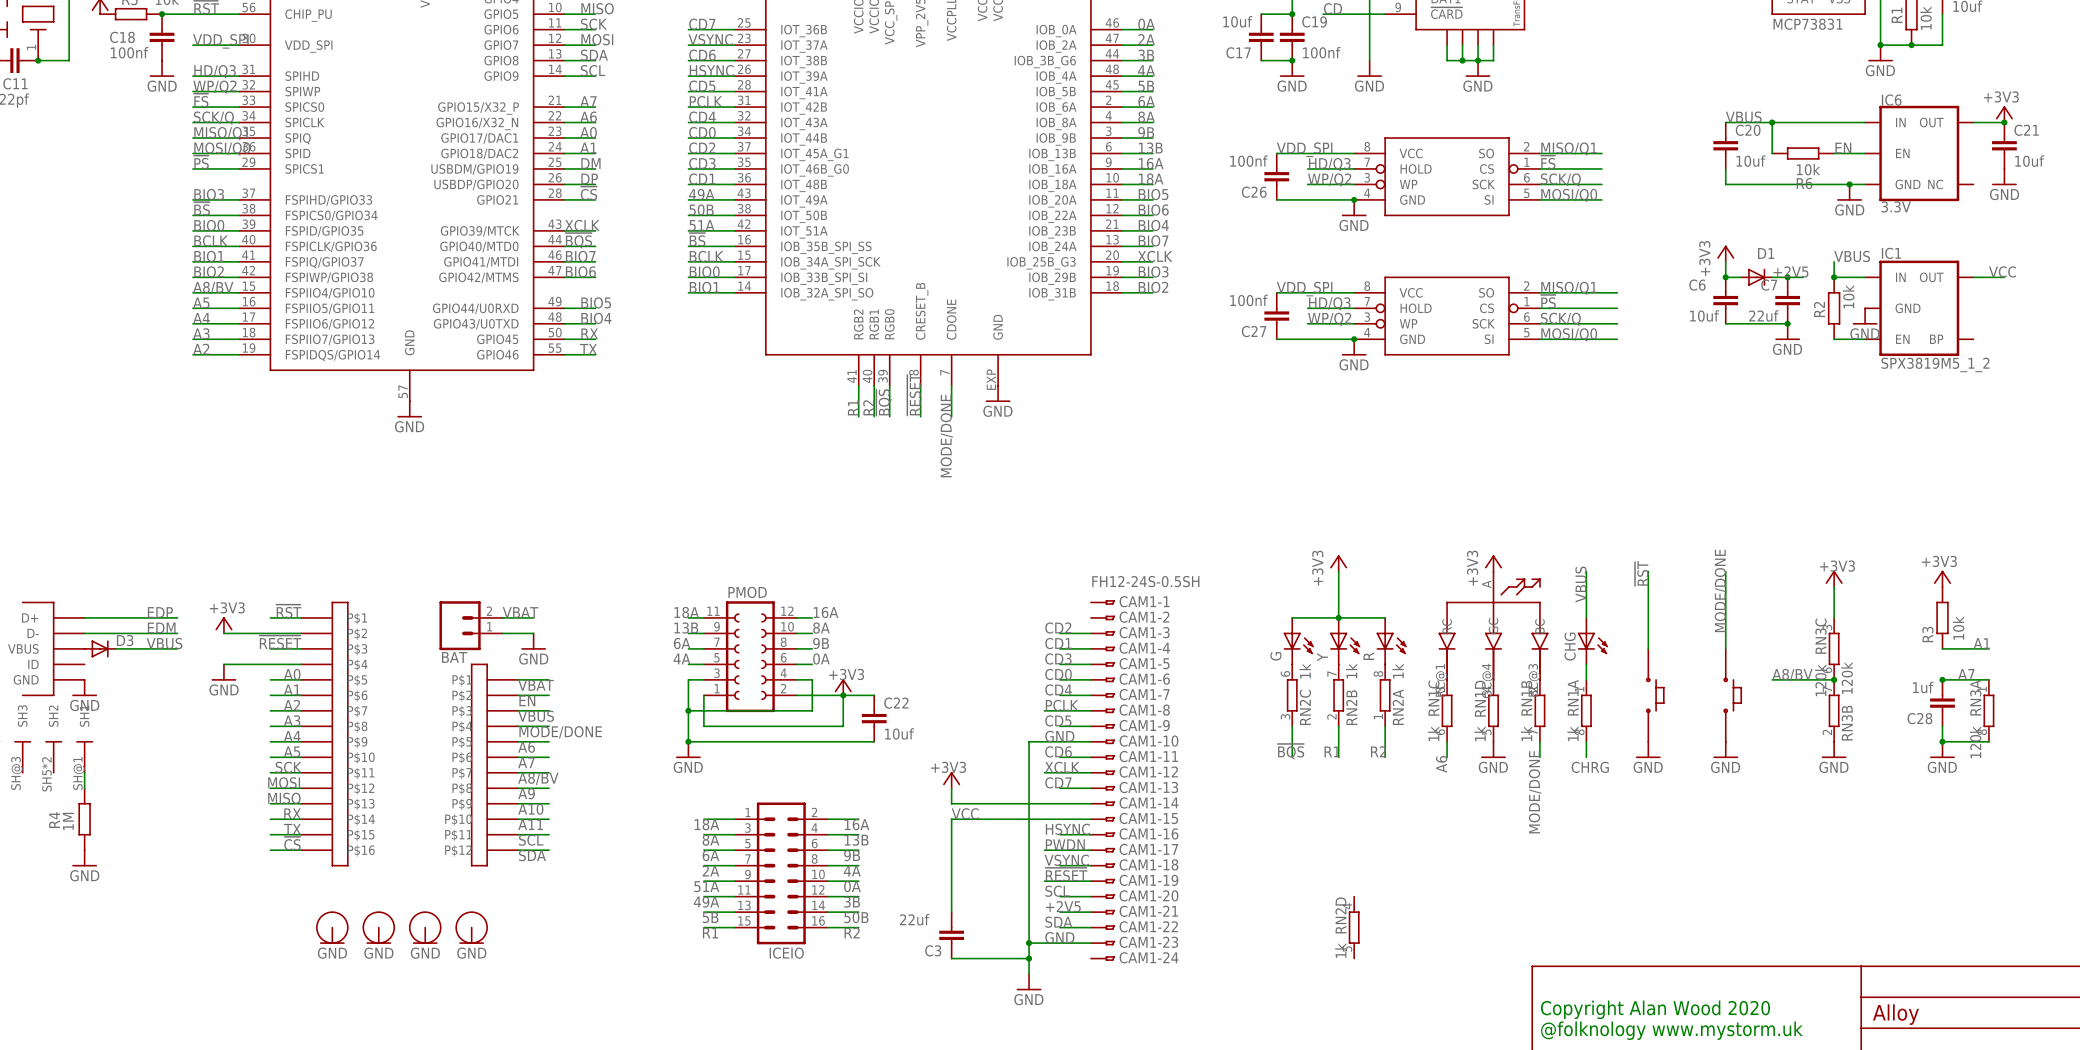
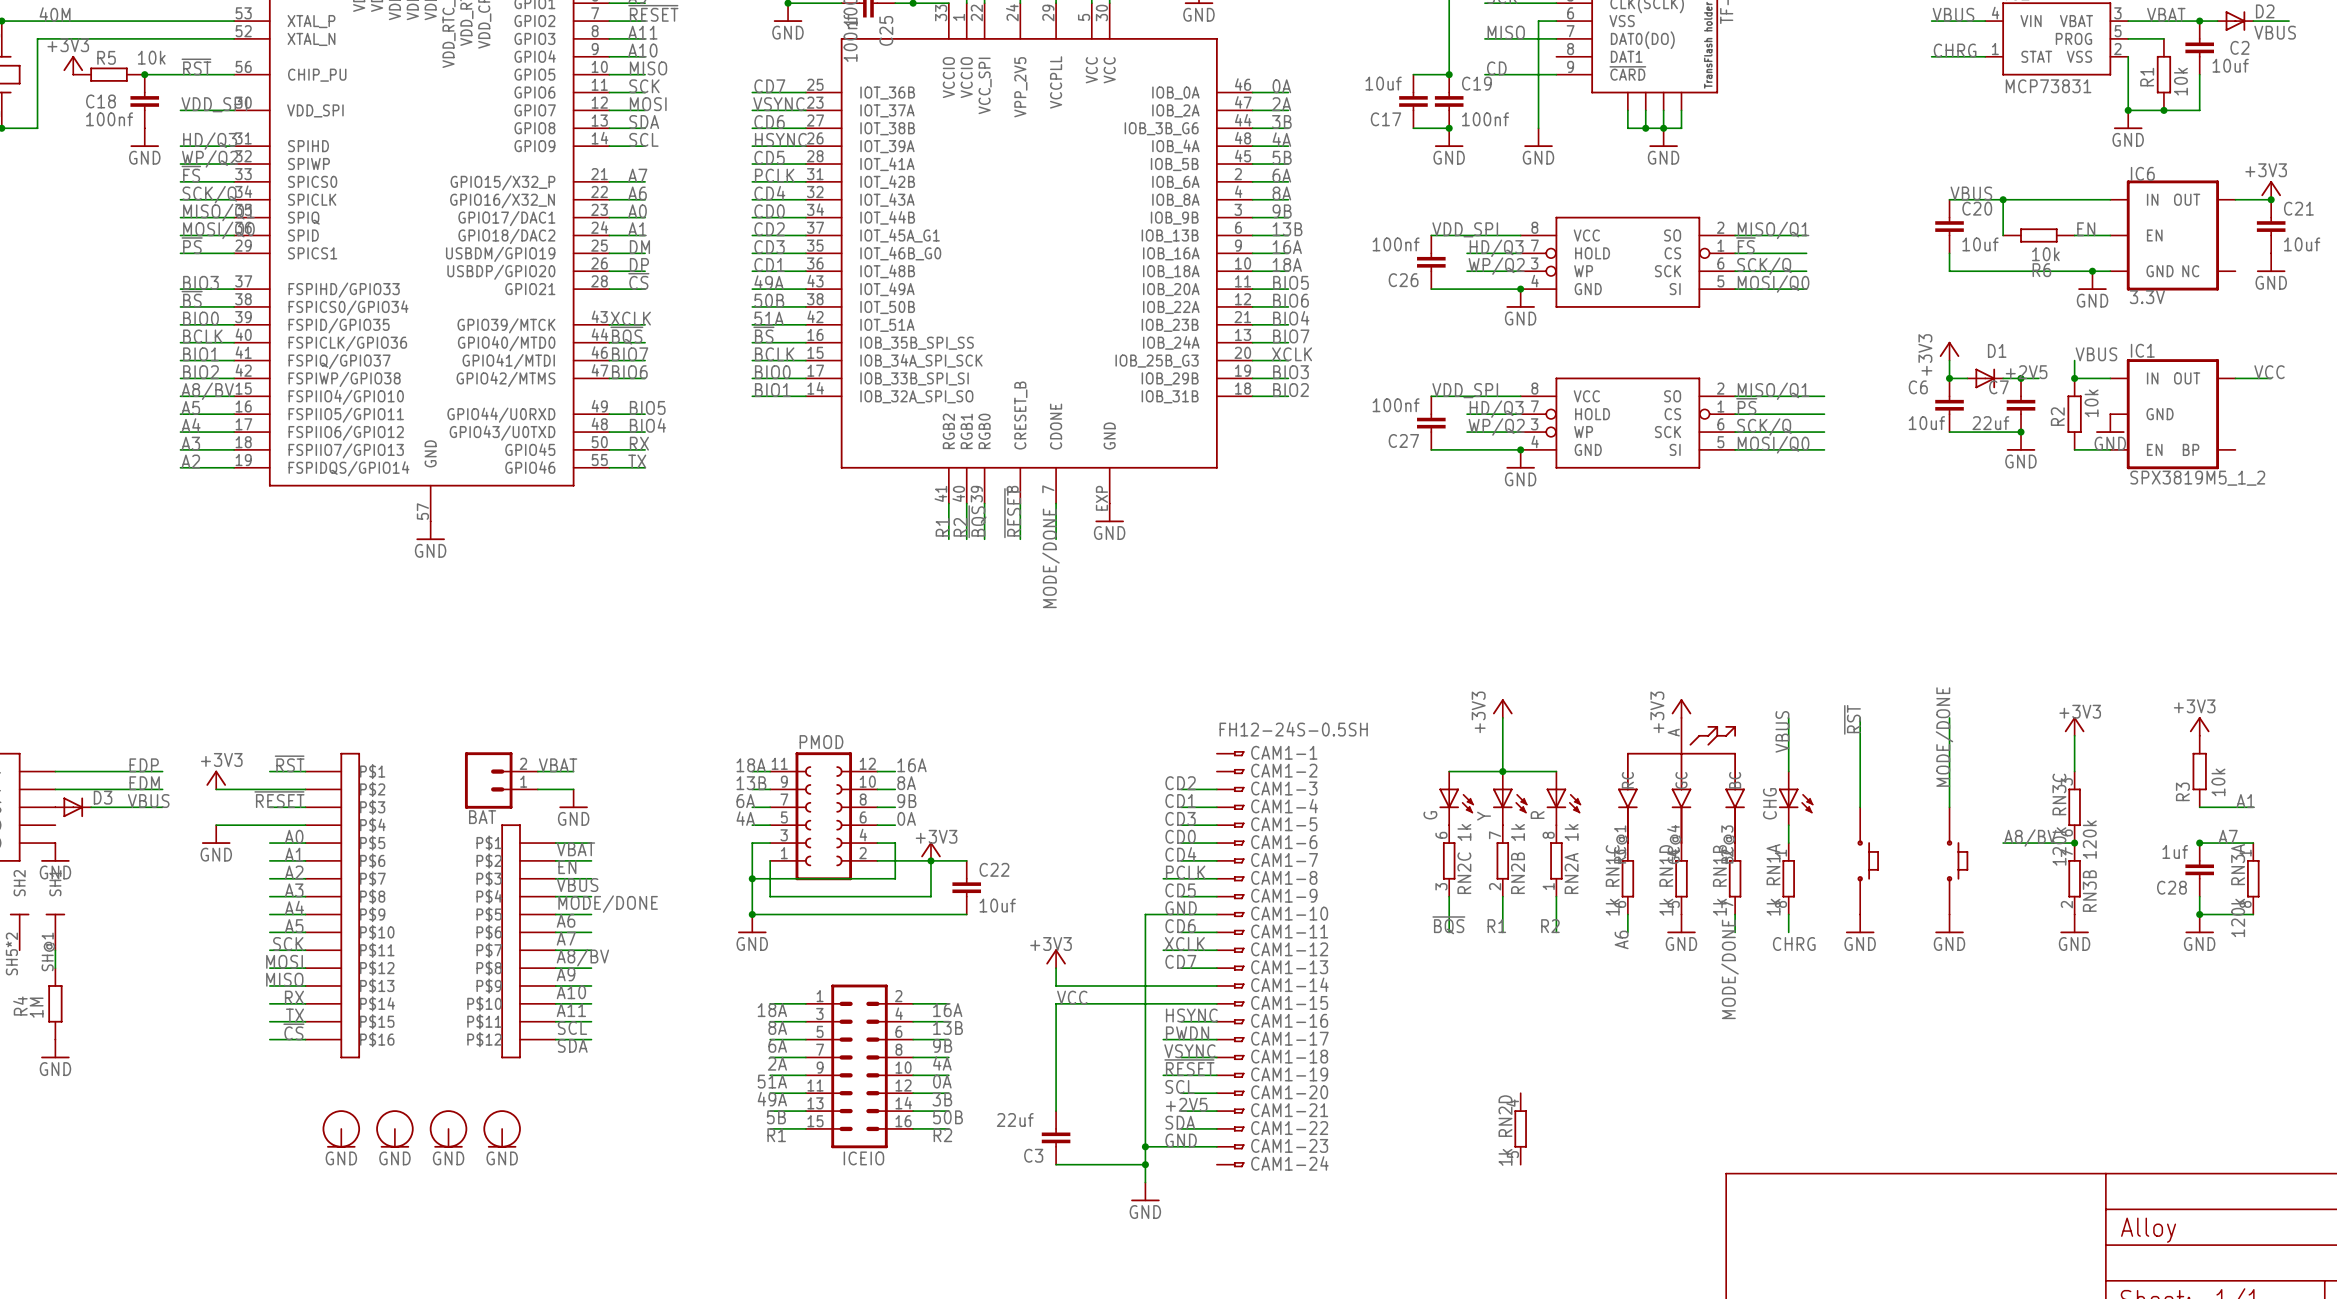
text: Copyright Alan Wood 2020 (1655, 1009) -> none
text: @folknology www.mystorm.uk (1671, 1030) -> none

